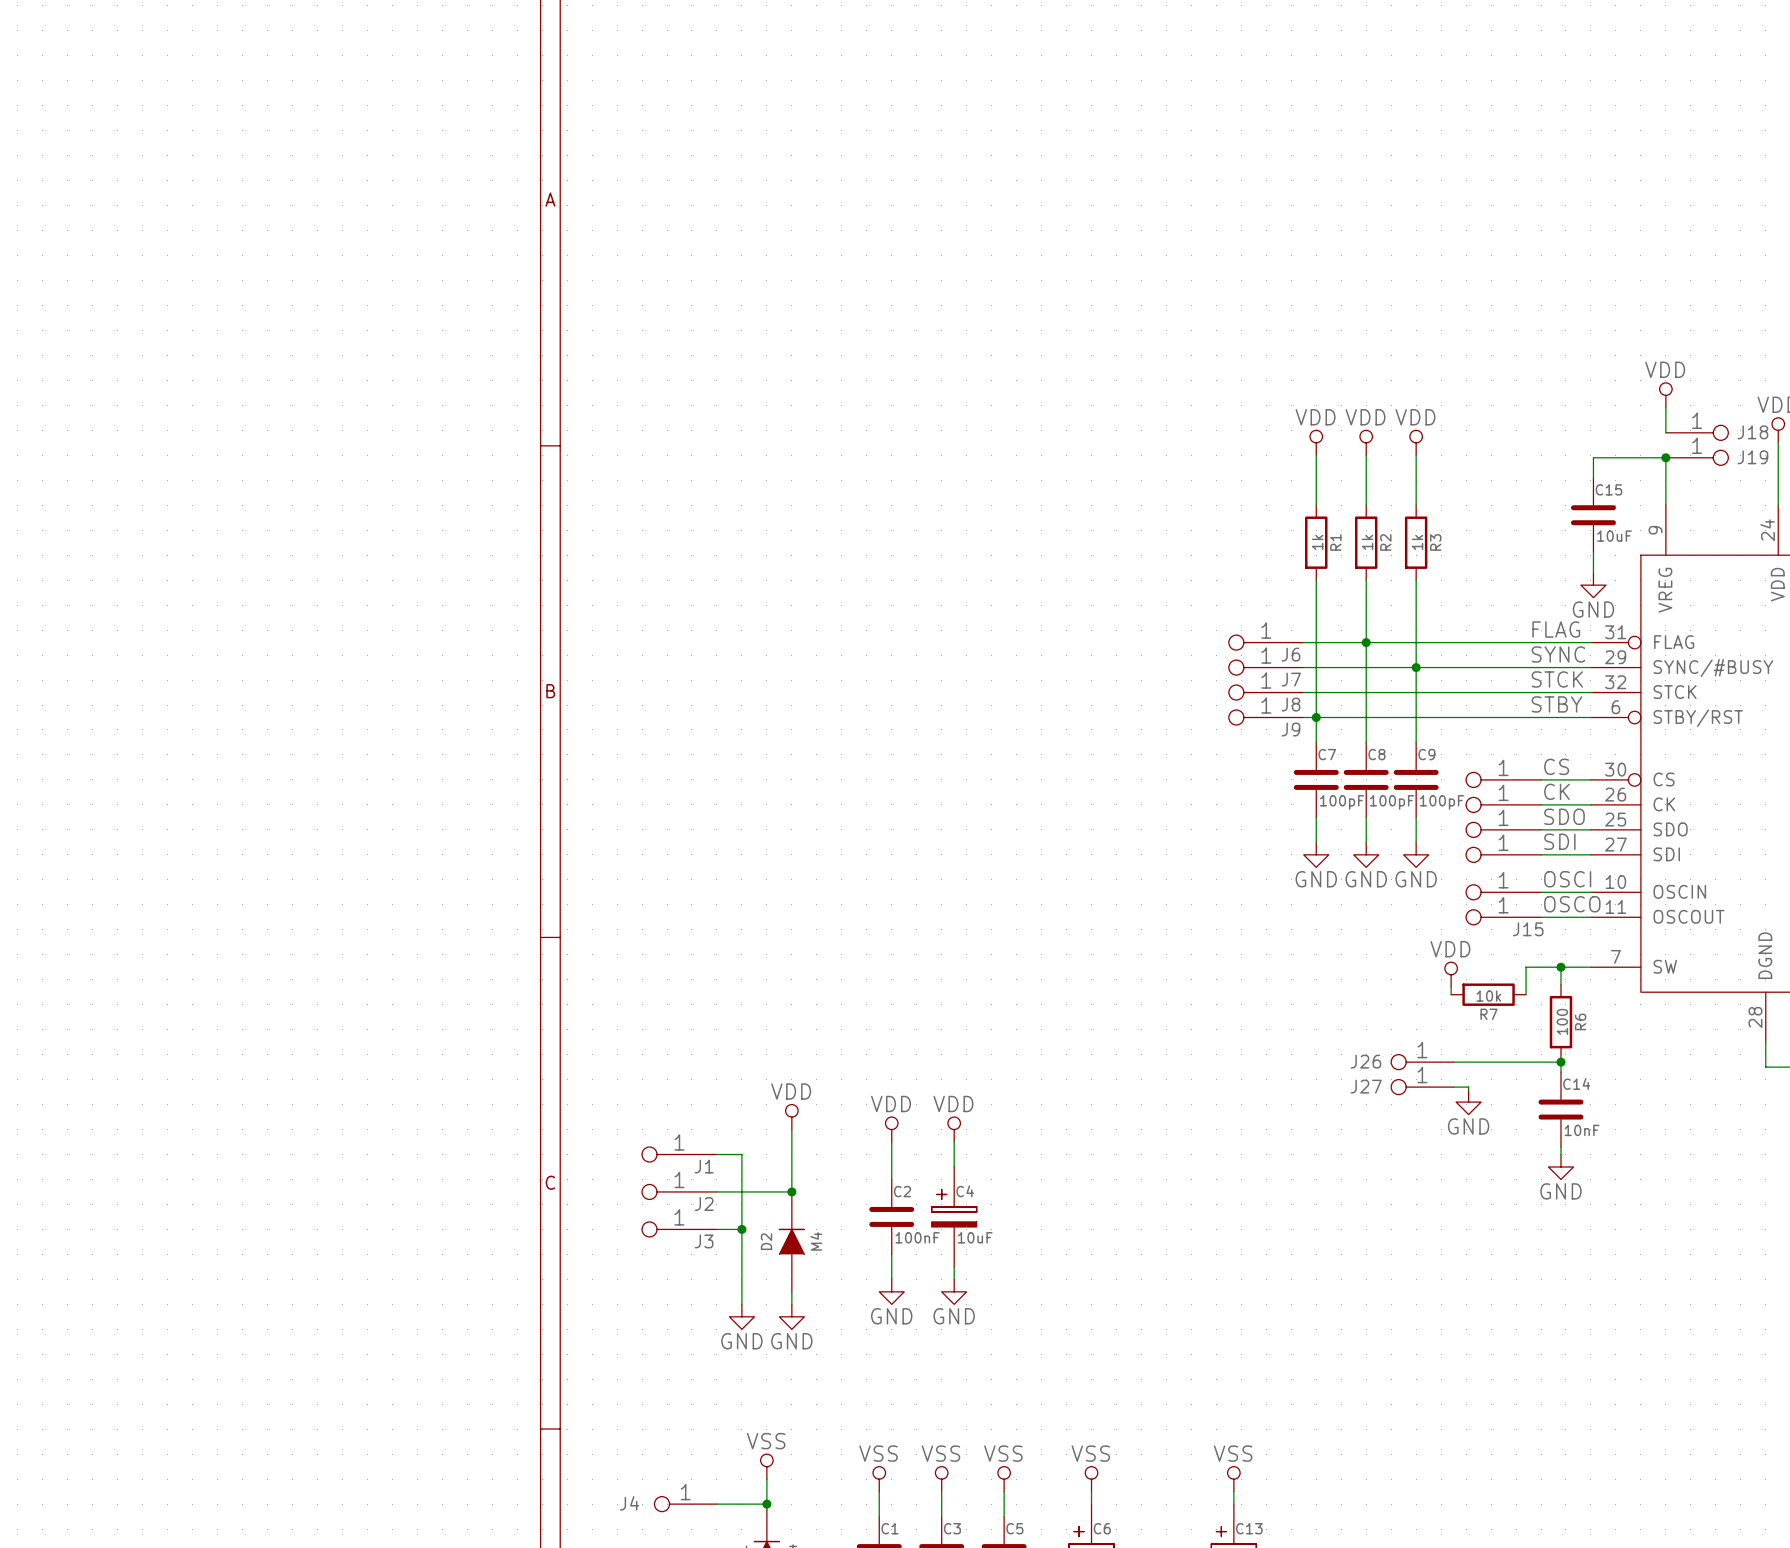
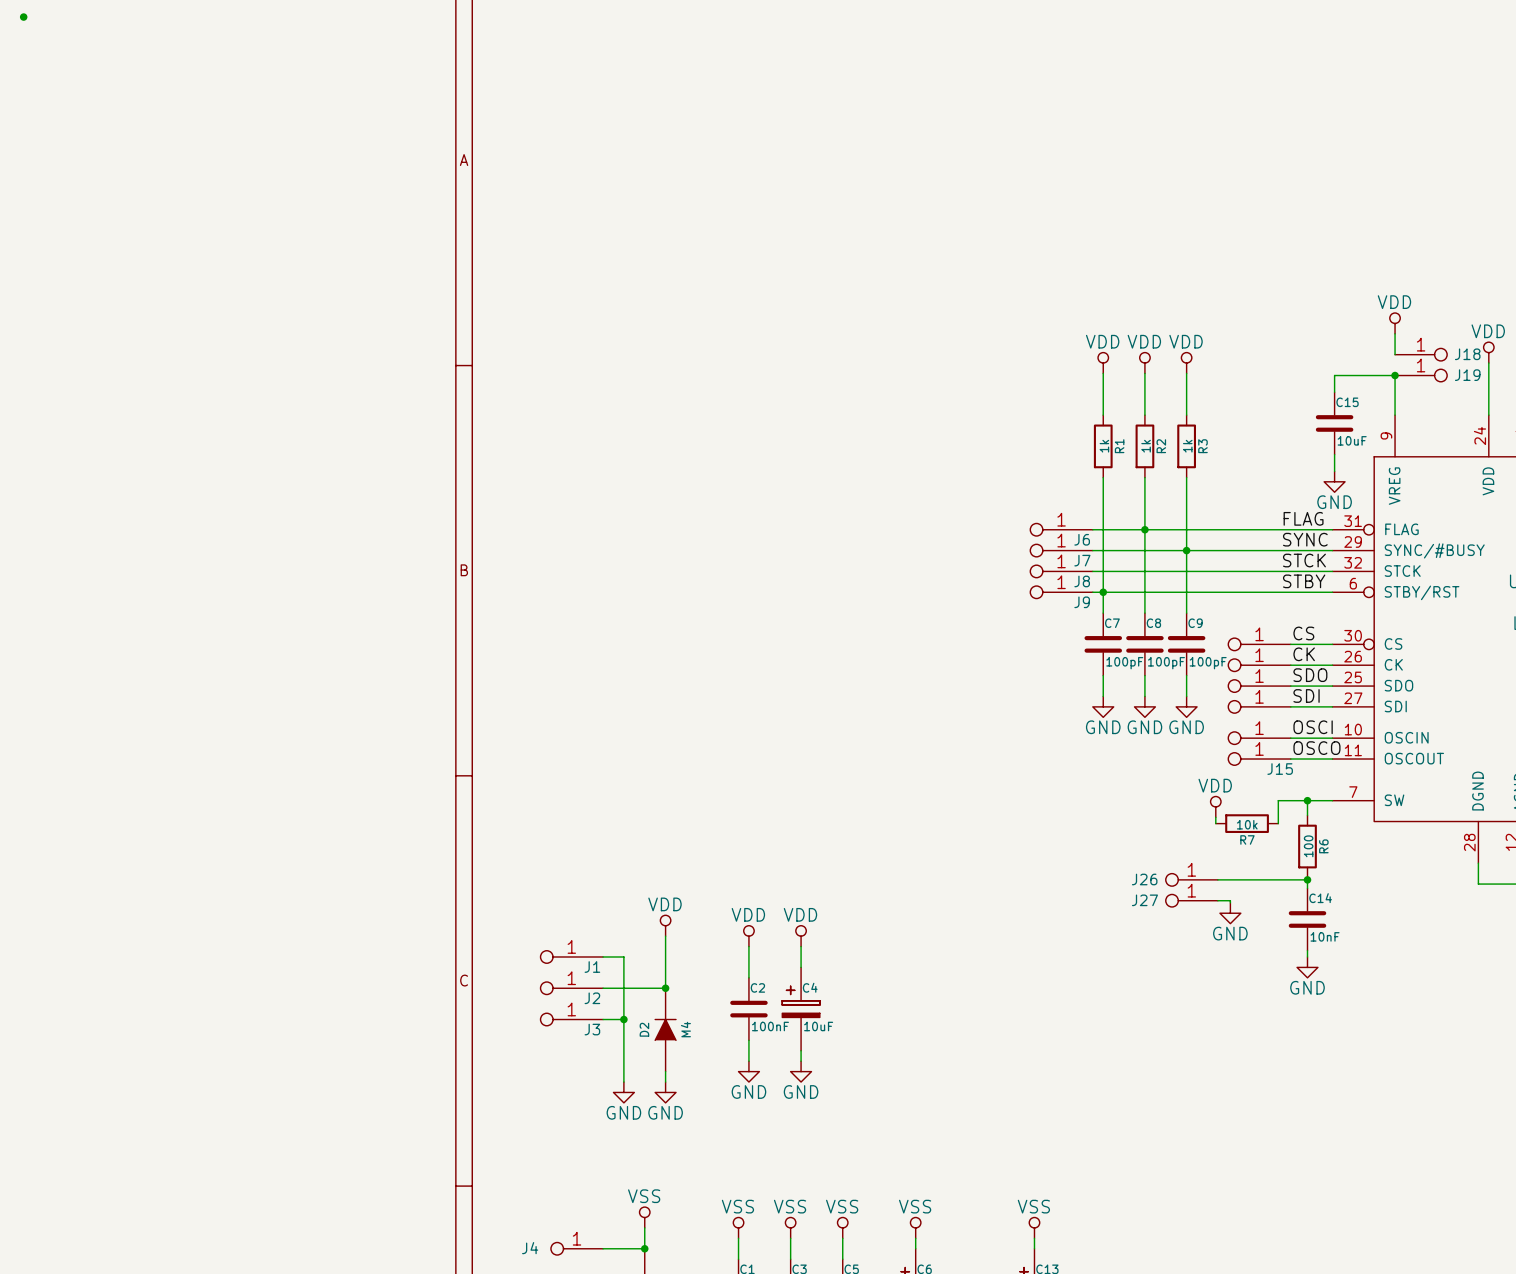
junction: none -> (23, 17)

